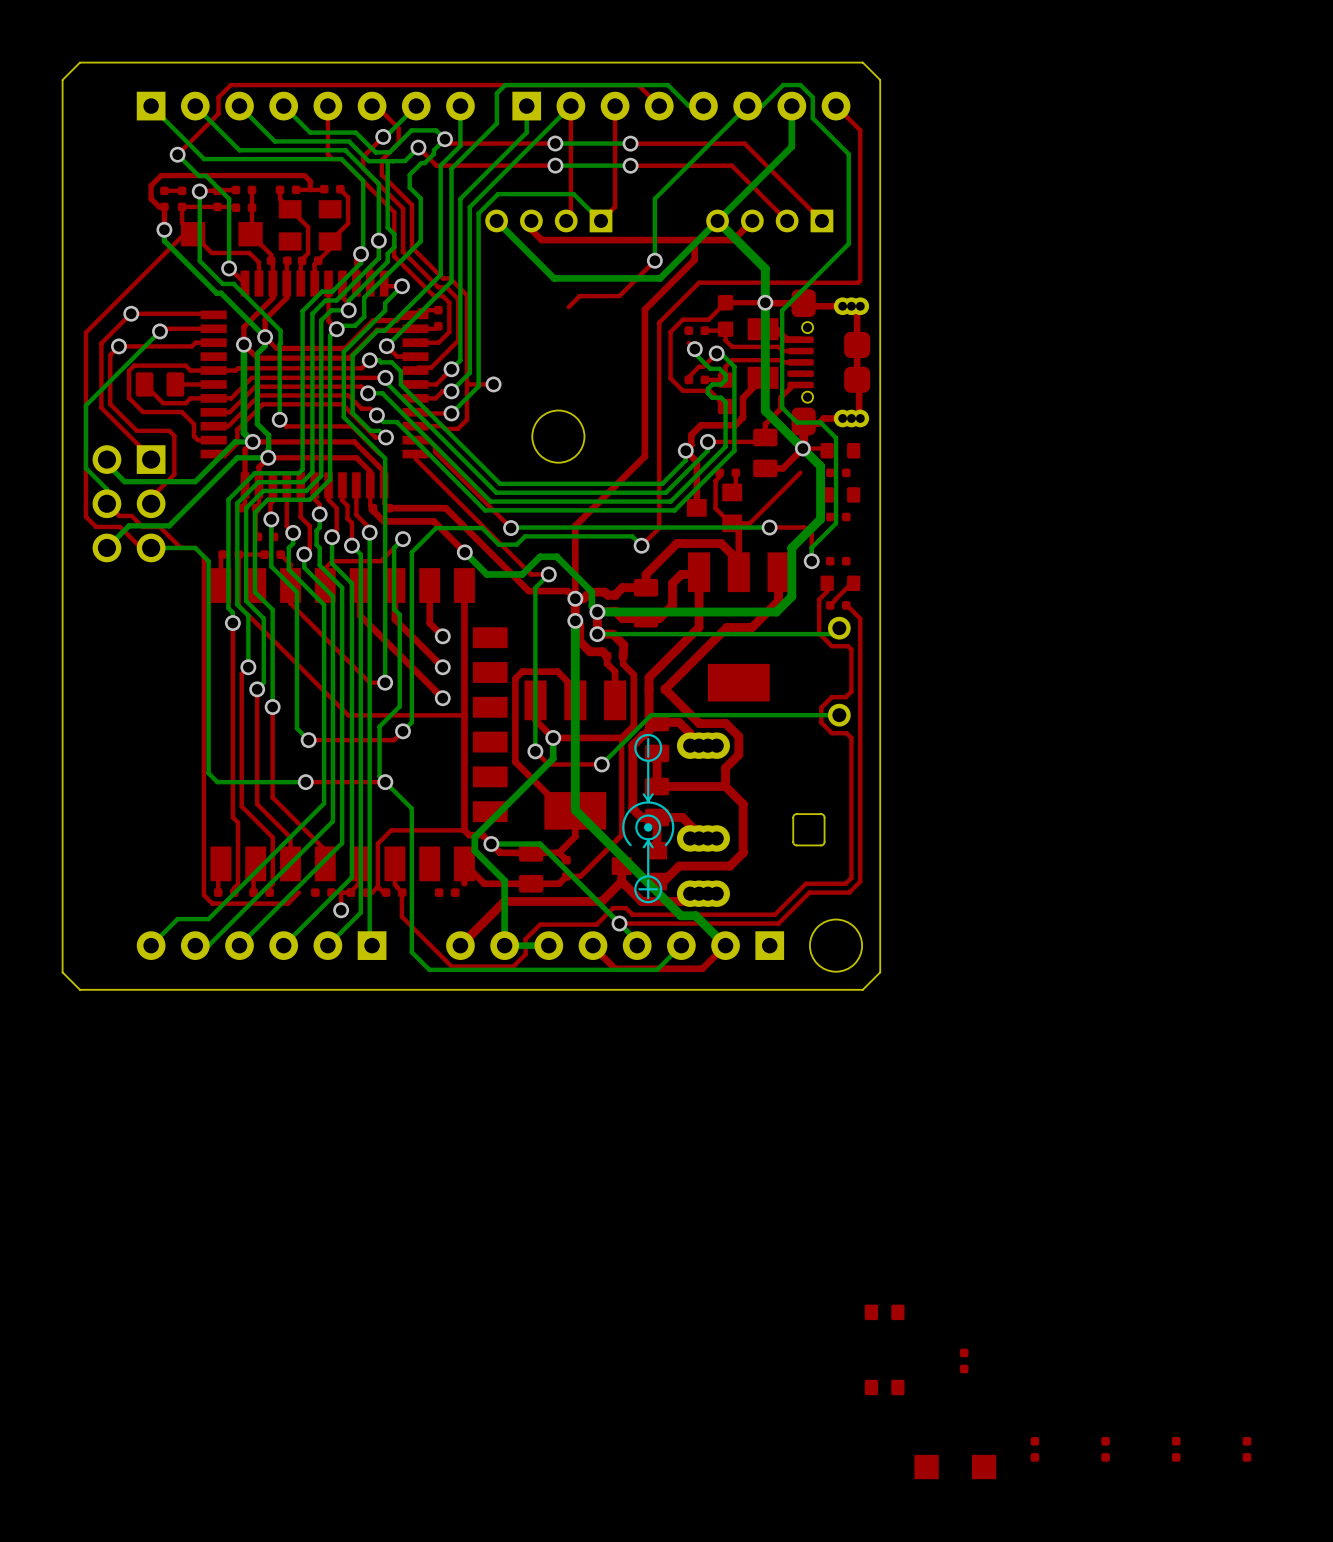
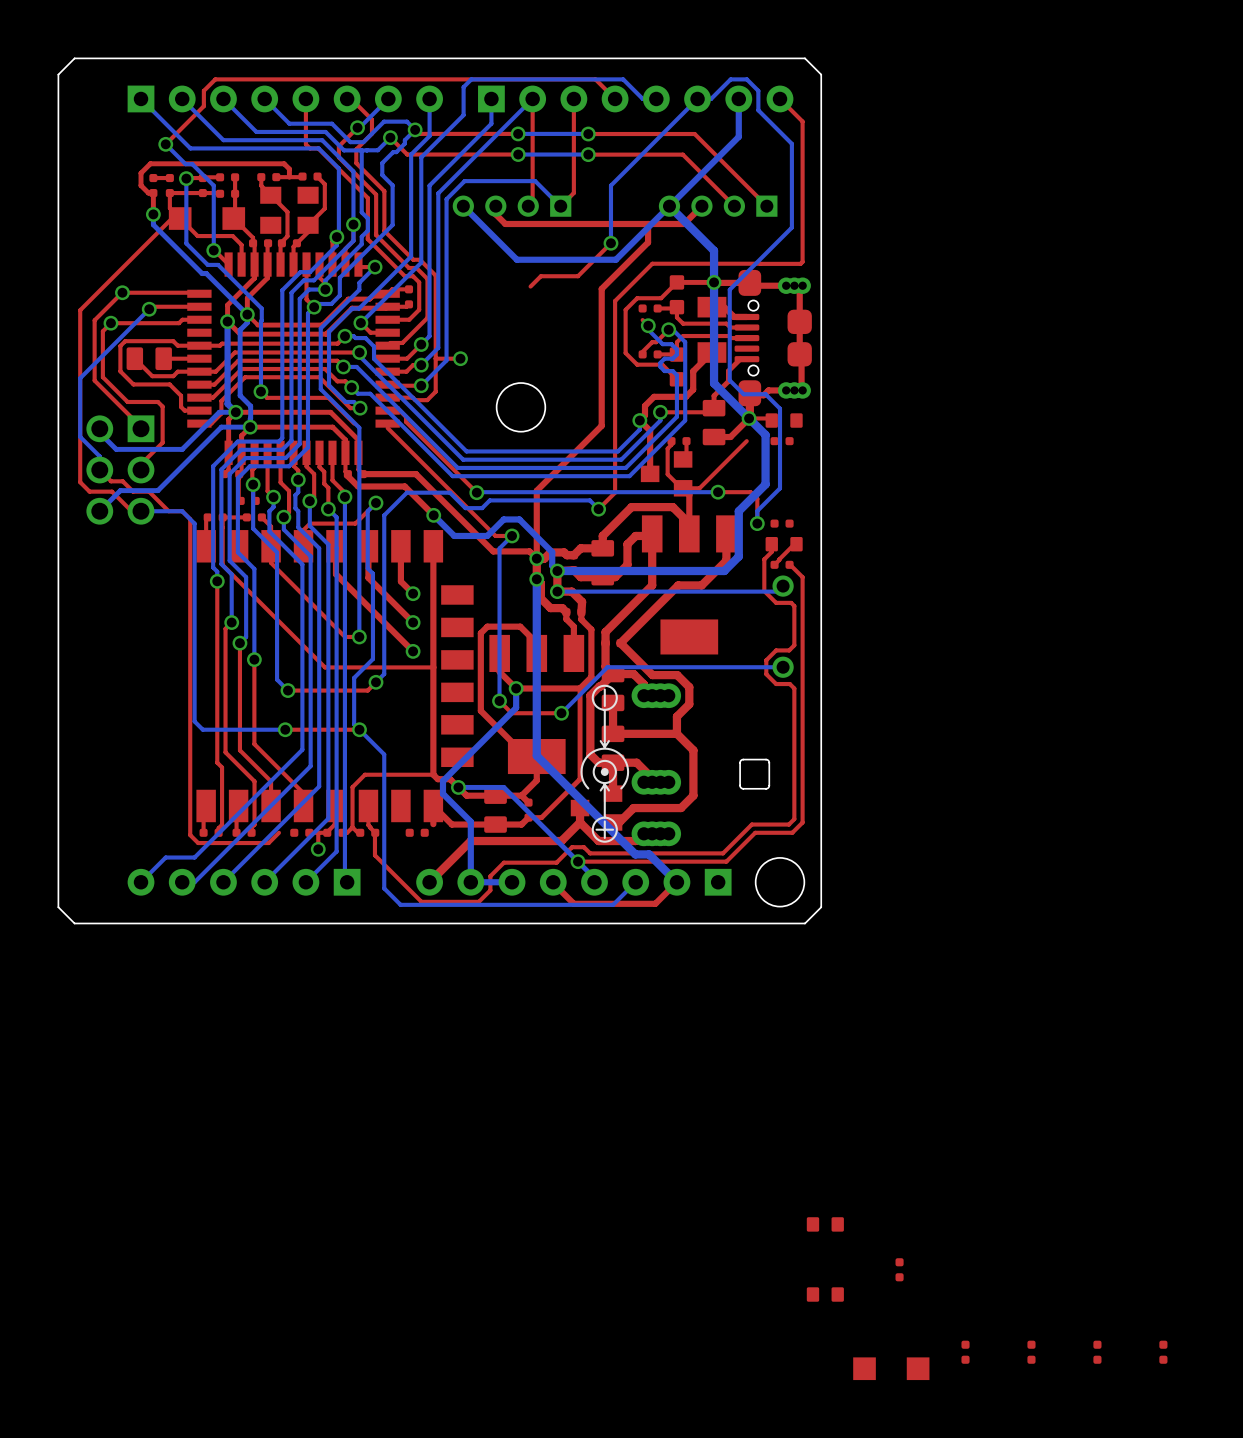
part: (840, 494) -> none
part: (838, 517) -> none

